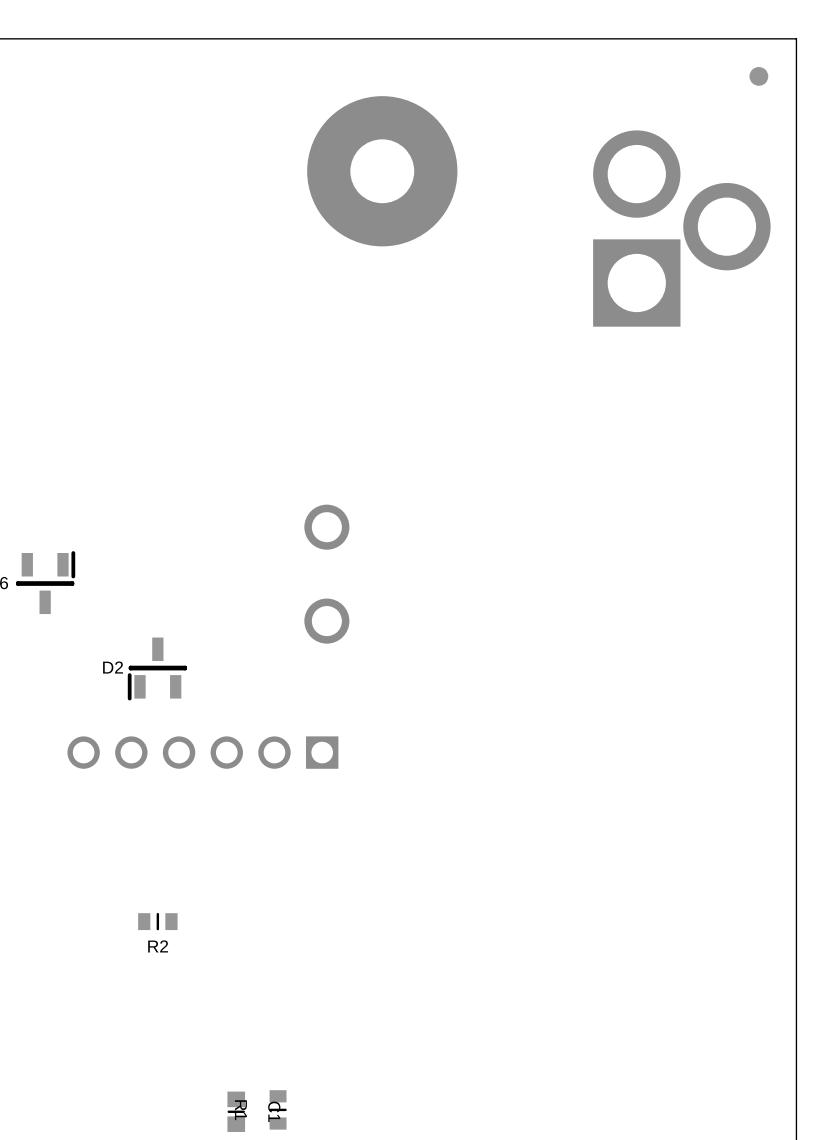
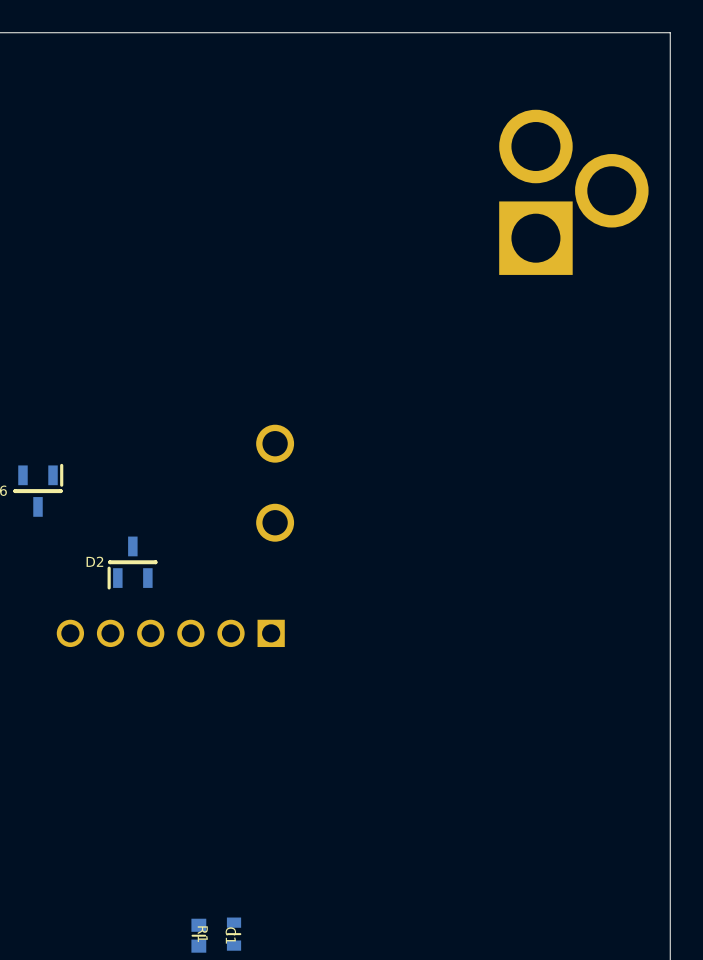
part: (758, 76) -> none
part: (382, 171) -> none
R2: (157, 921) -> none

